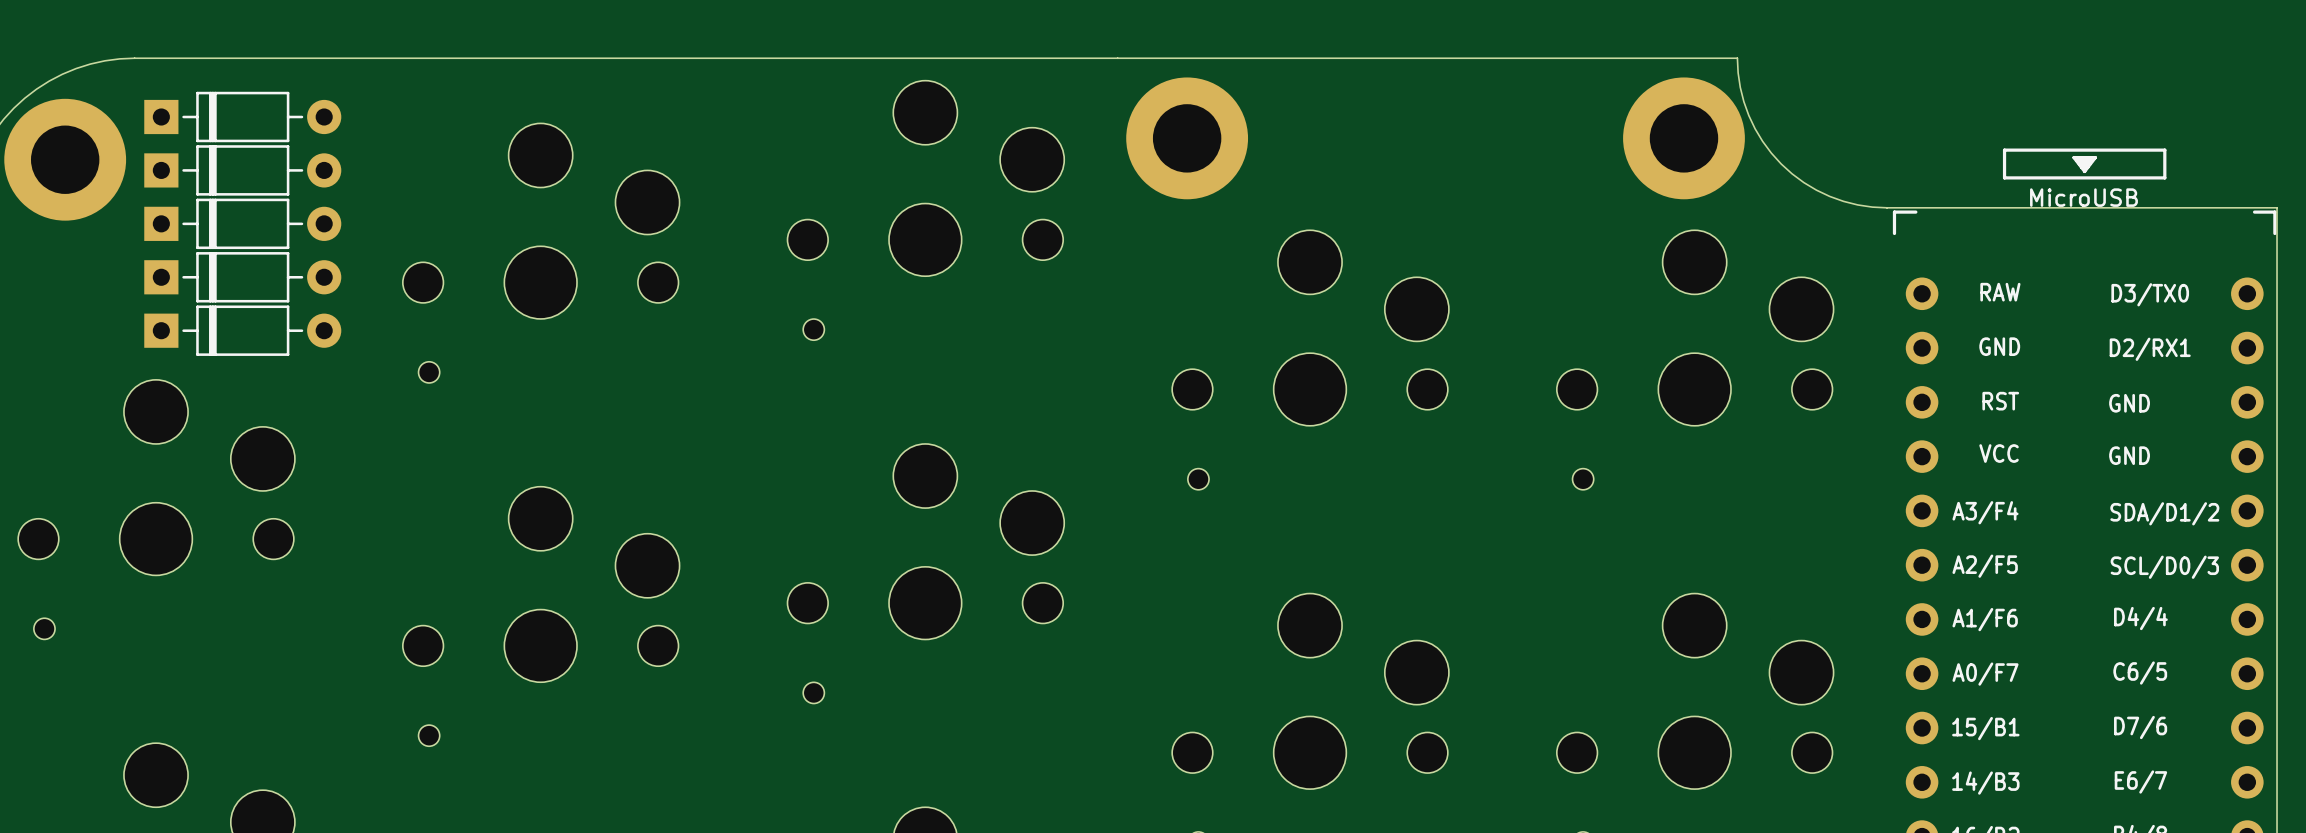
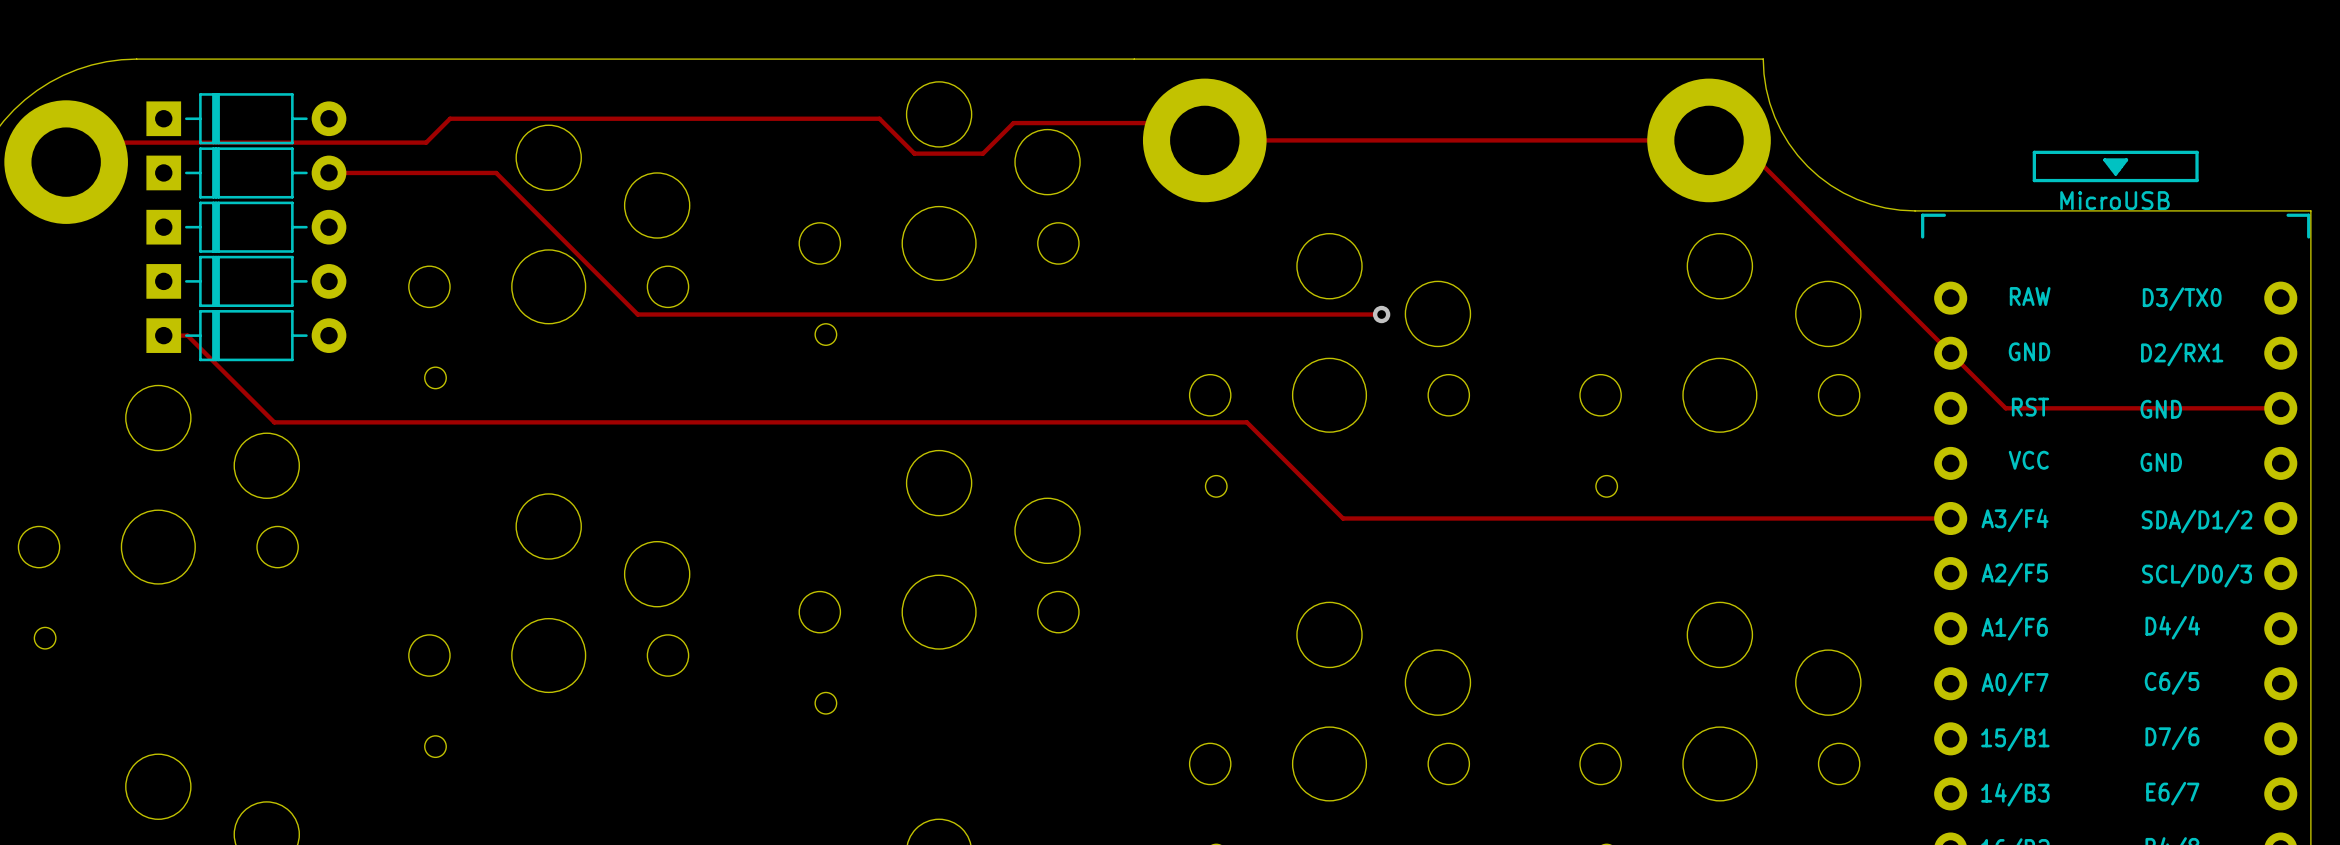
track: none -> (66, 162) (85, 142) (426, 142) (450, 118) (879, 118) (914, 153) (982, 153) (1013, 123) (1187, 123) (1204, 140) (1737, 140) (2005, 408) (2280, 408)
track: none -> (329, 172) (496, 172) (637, 314) (1381, 314)
via: none -> (1381, 314)
track: none -> (163, 335) (187, 335) (274, 422) (1246, 422) (1343, 518) (1950, 518)

